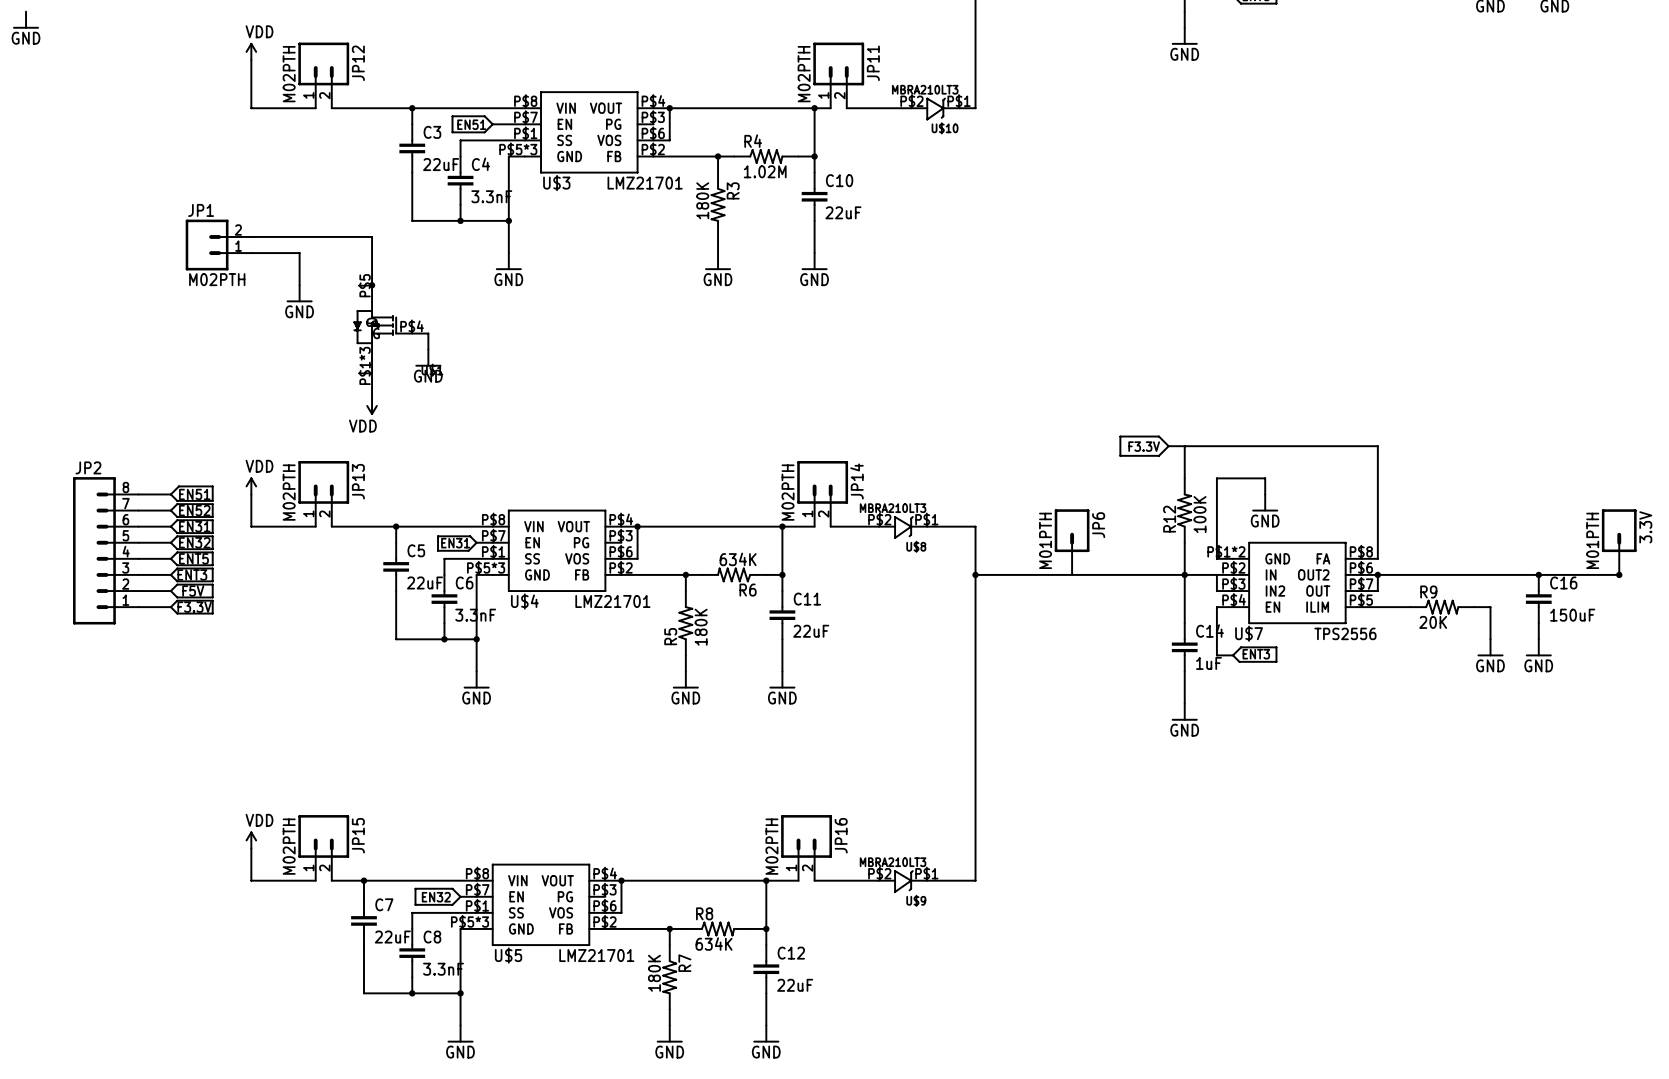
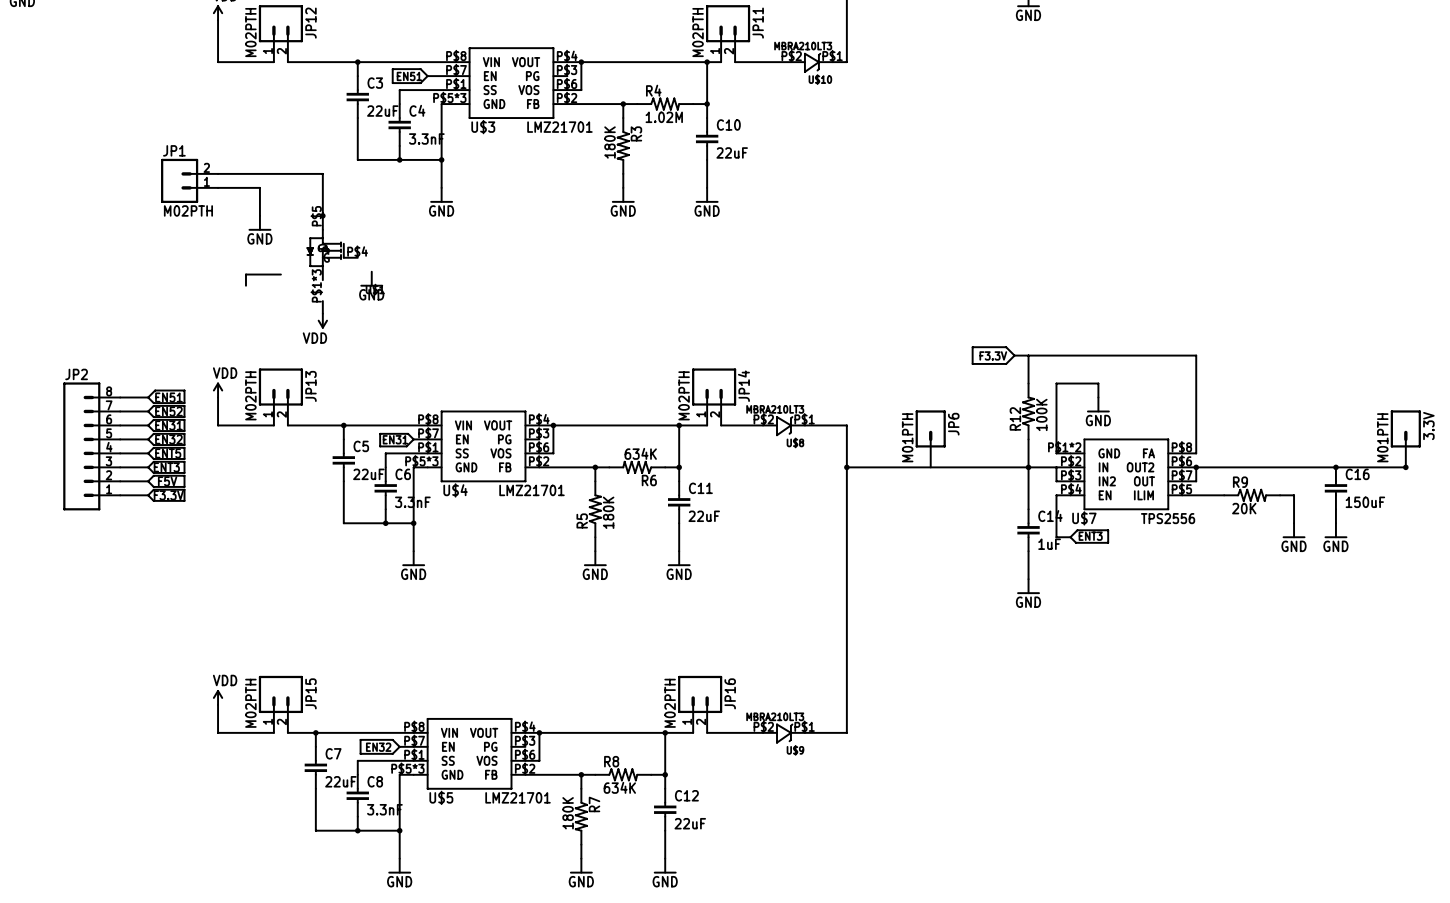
wire: (412, 333) (428, 333) (428, 349) -> none
wire: none -> (280, 274) (245, 274) (245, 285)
wire: (372, 357) (372, 383) -> none

